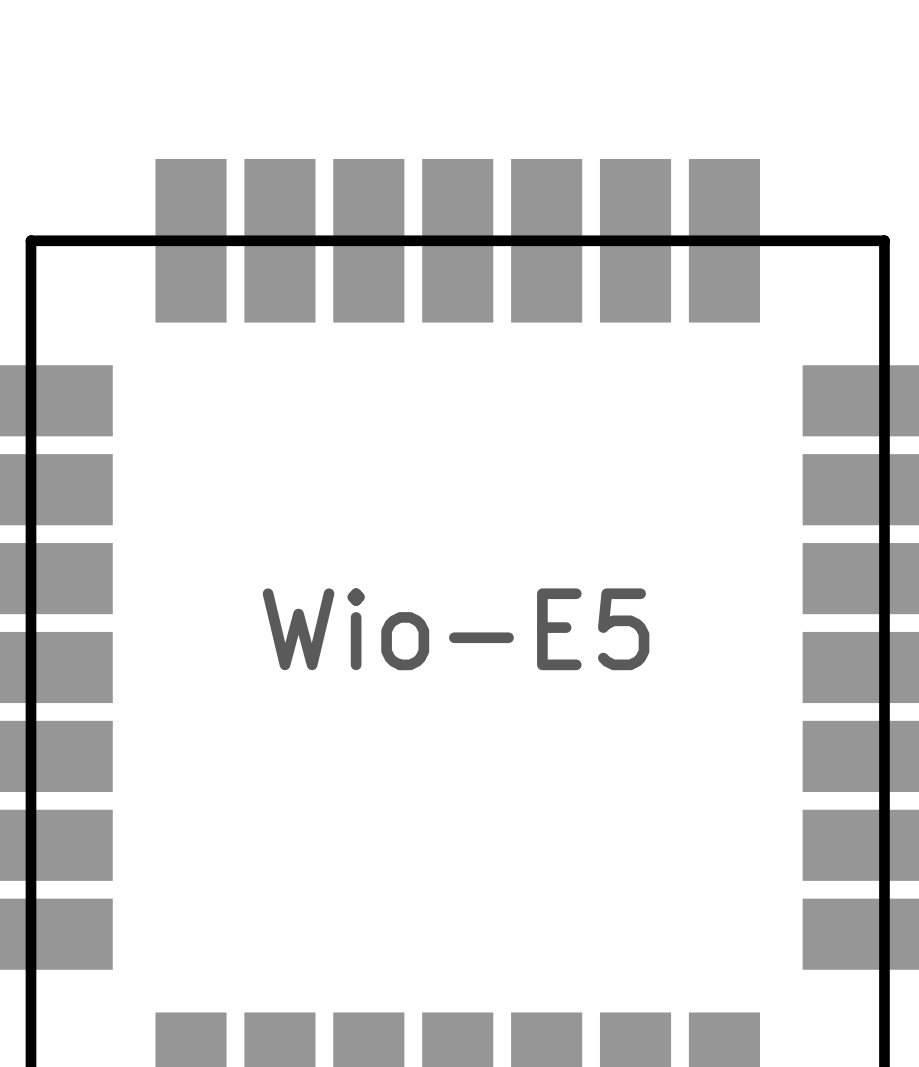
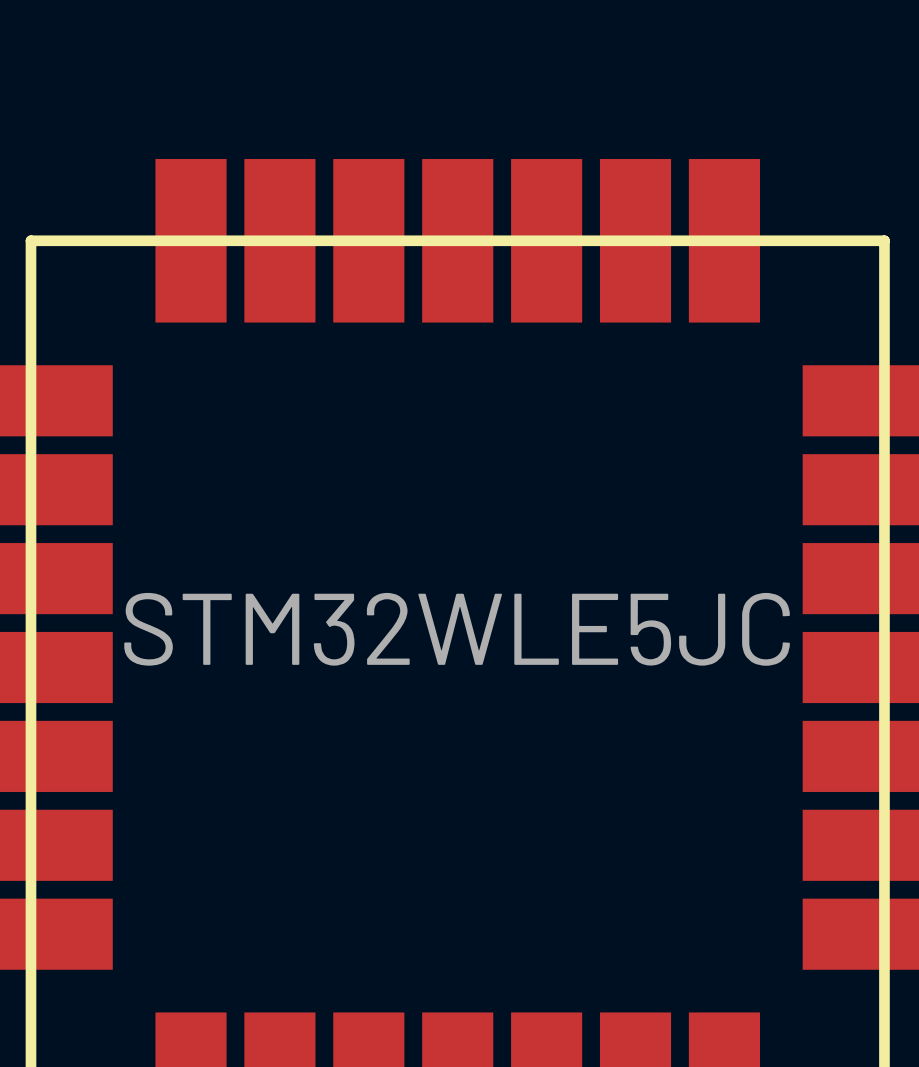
part value: Wio-E5 (456, 629) -> STM32WLE5JC (457, 629)

